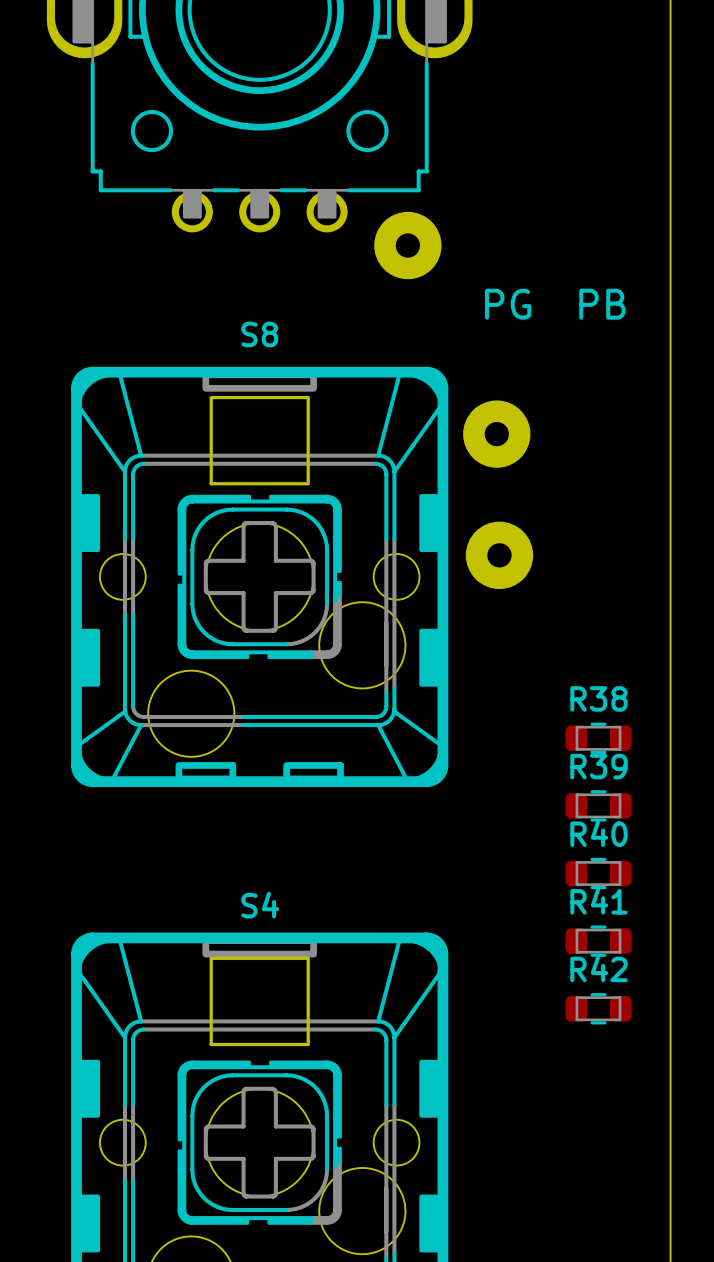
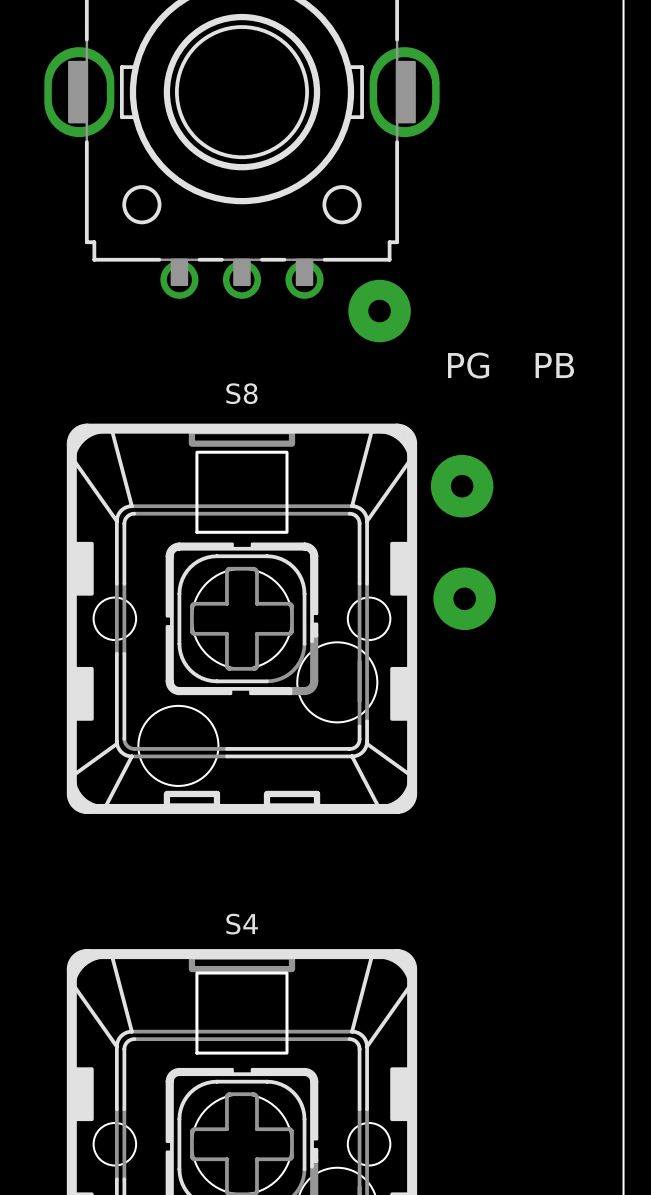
R38: (598, 738) -> none
R39: (598, 805) -> none
R40: (598, 873) -> none
R41: (598, 941) -> none
R42: (598, 1008) -> none

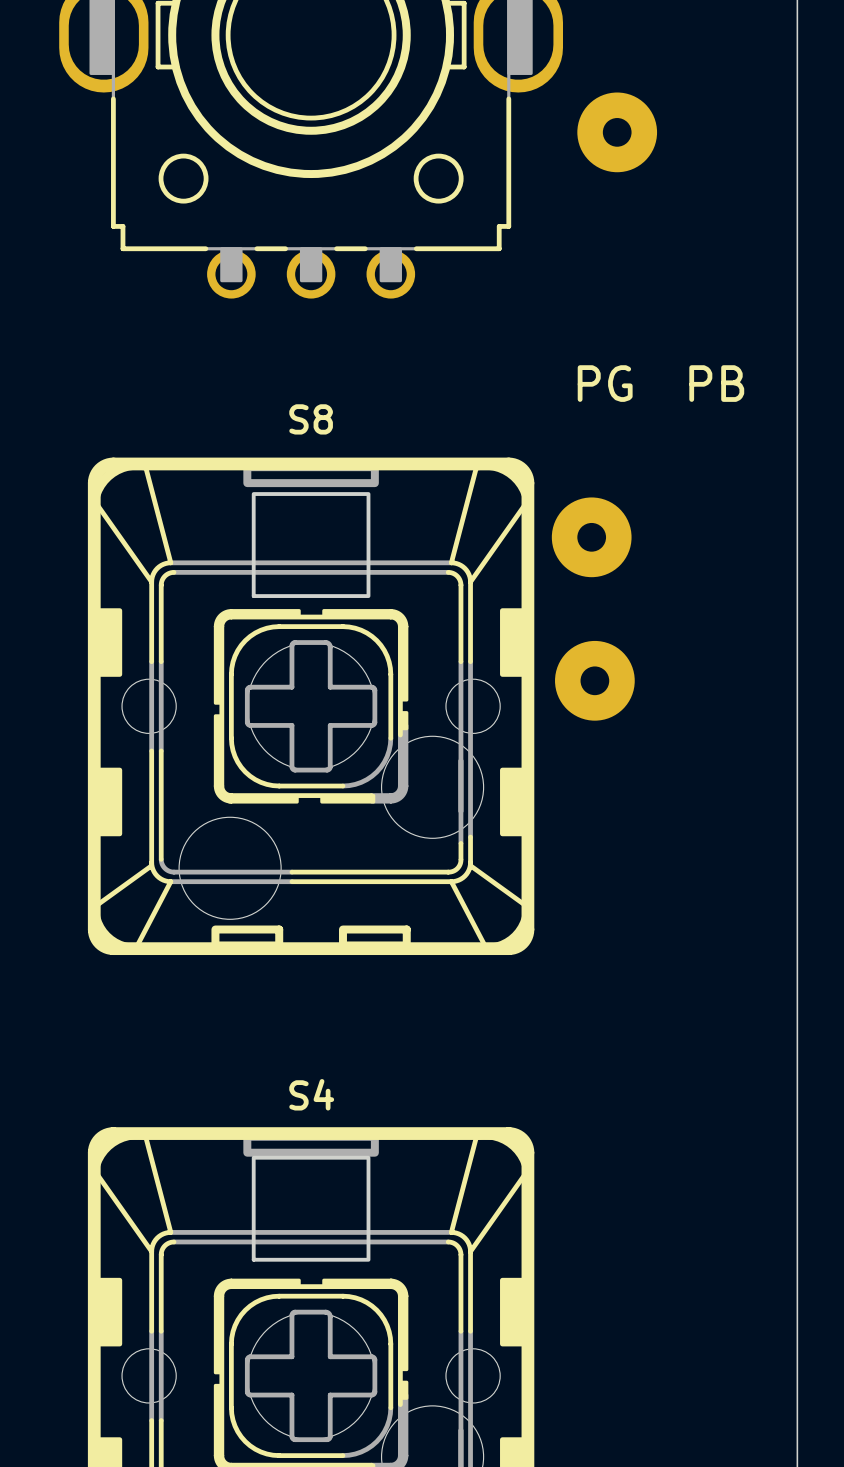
part position: (379, 311) -> (617, 132)

